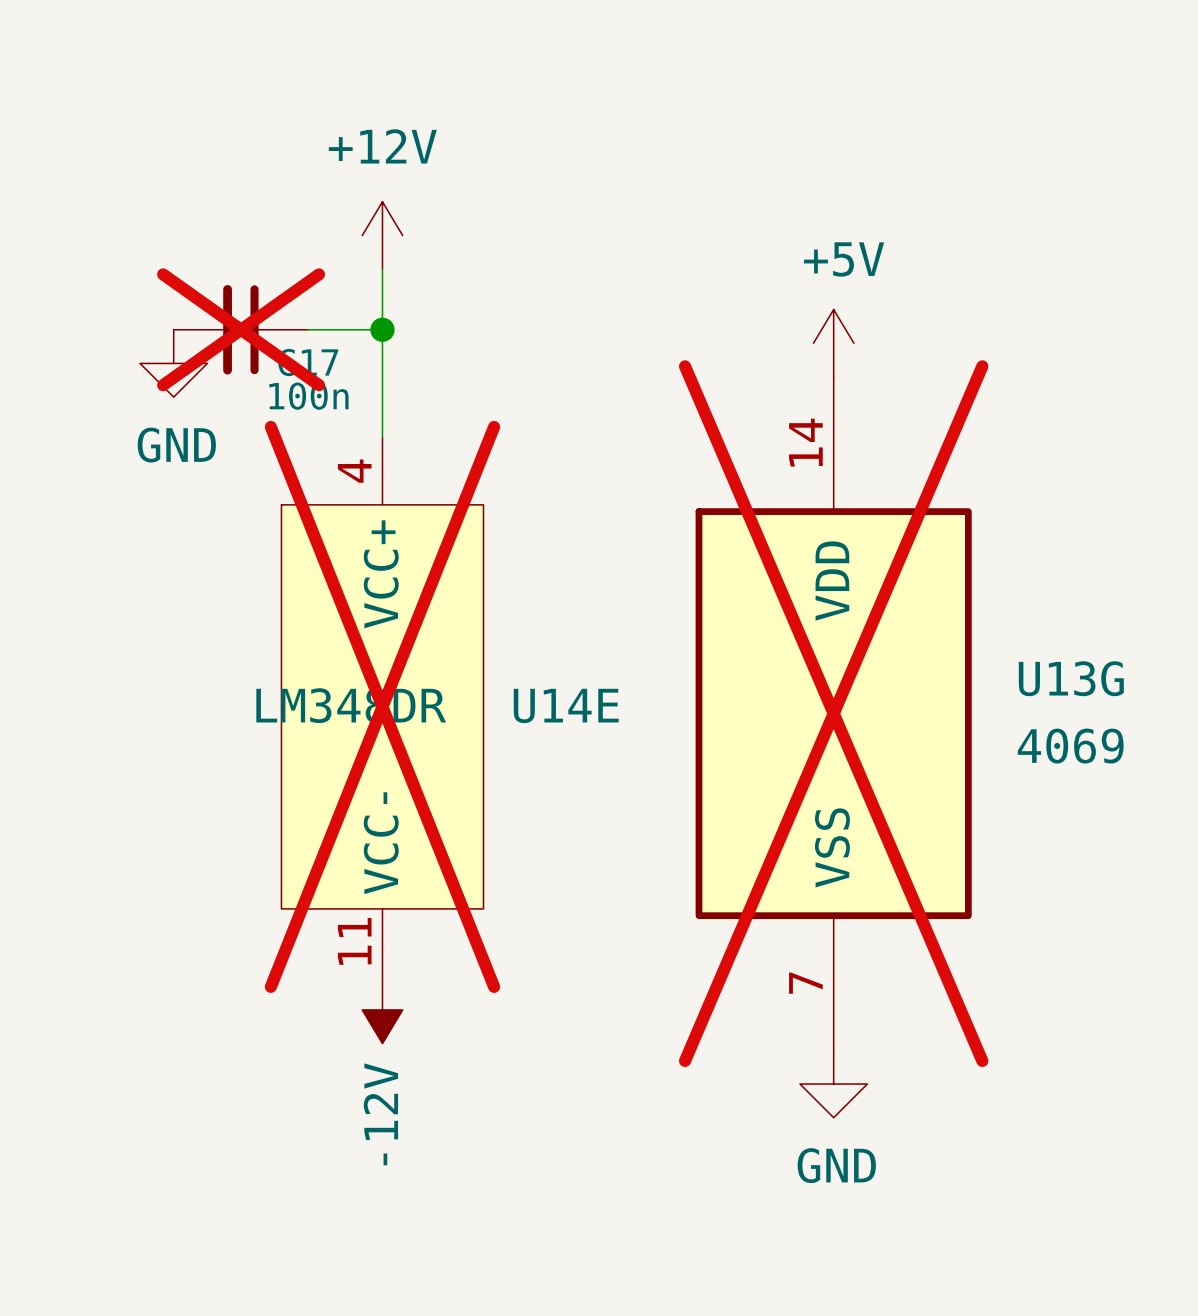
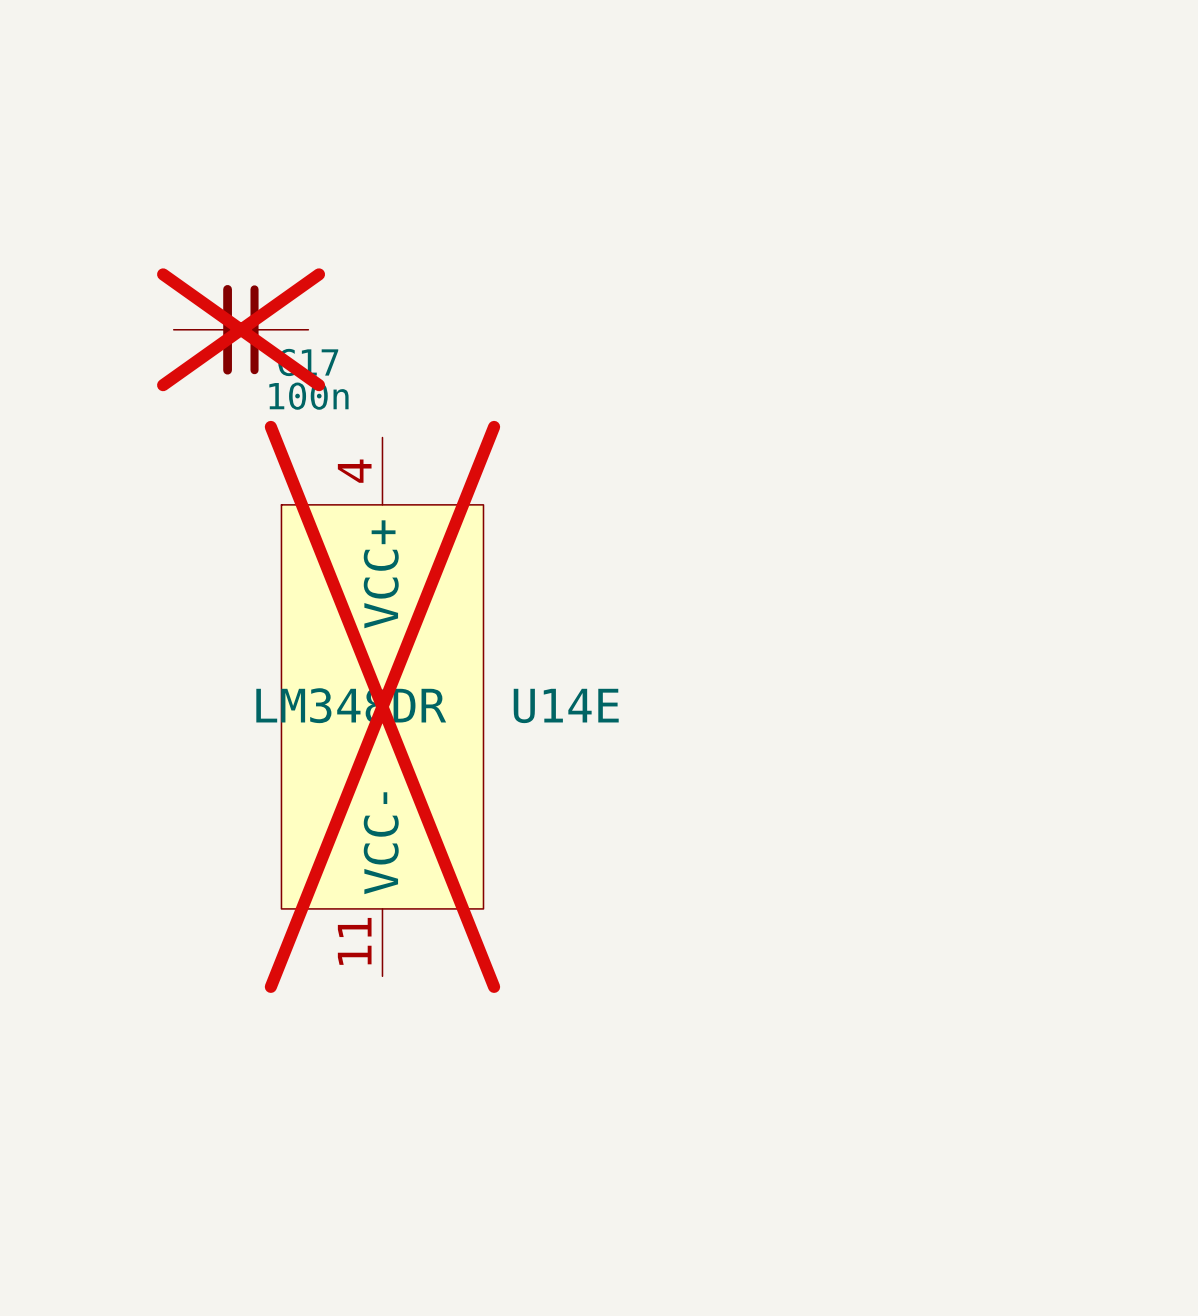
power symbol: +12V (382, 235) -> none
wire: (382, 269) (382, 437) -> none
wire: (308, 329) (382, 329) -> none
junction: (382, 329) -> none
power symbol: +5V (833, 343) -> none
power symbol: GND (173, 363) -> none
U13G: 4069 (833, 713) -> none
power symbol: -12V (382, 1009) -> none
power symbol: GND (833, 1084) -> none

